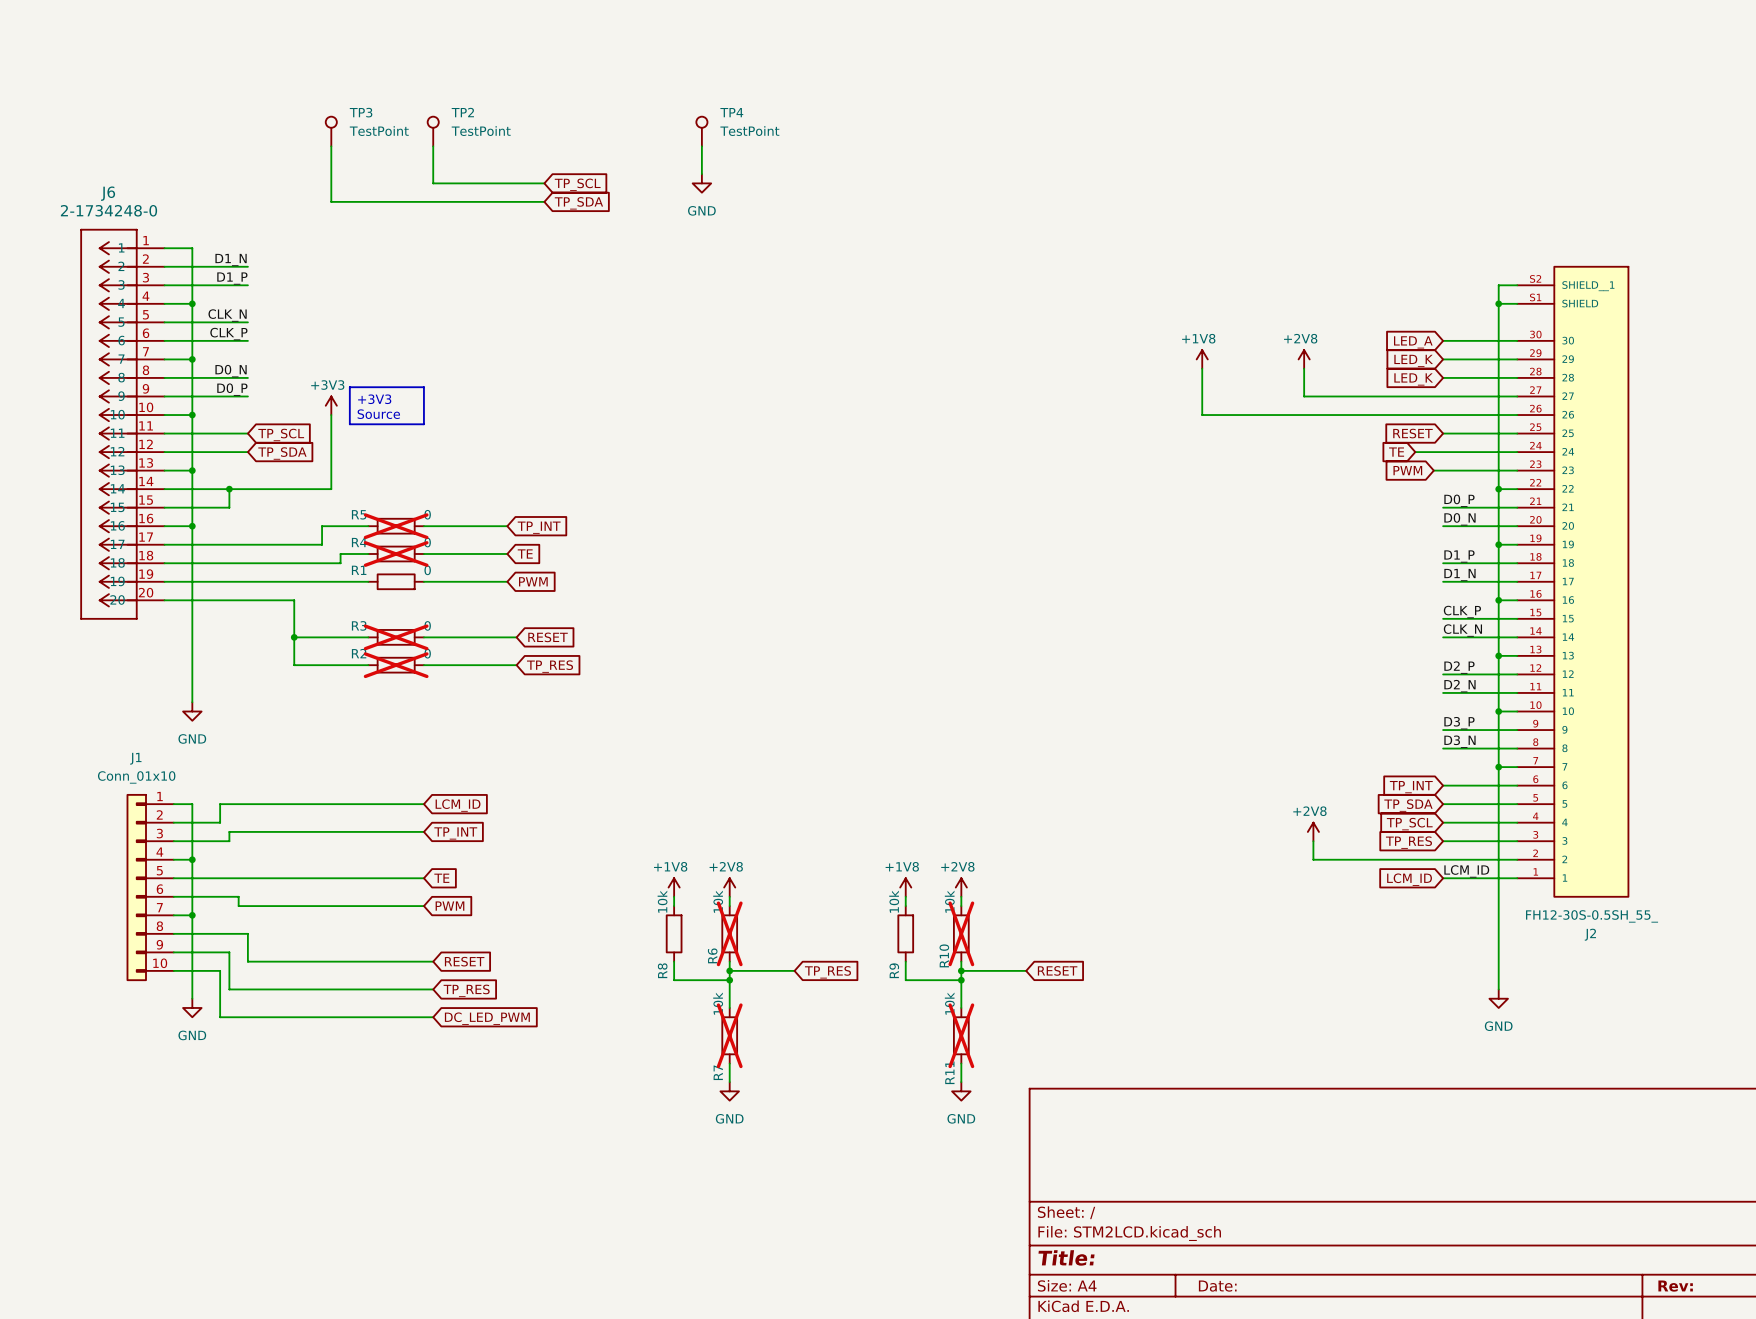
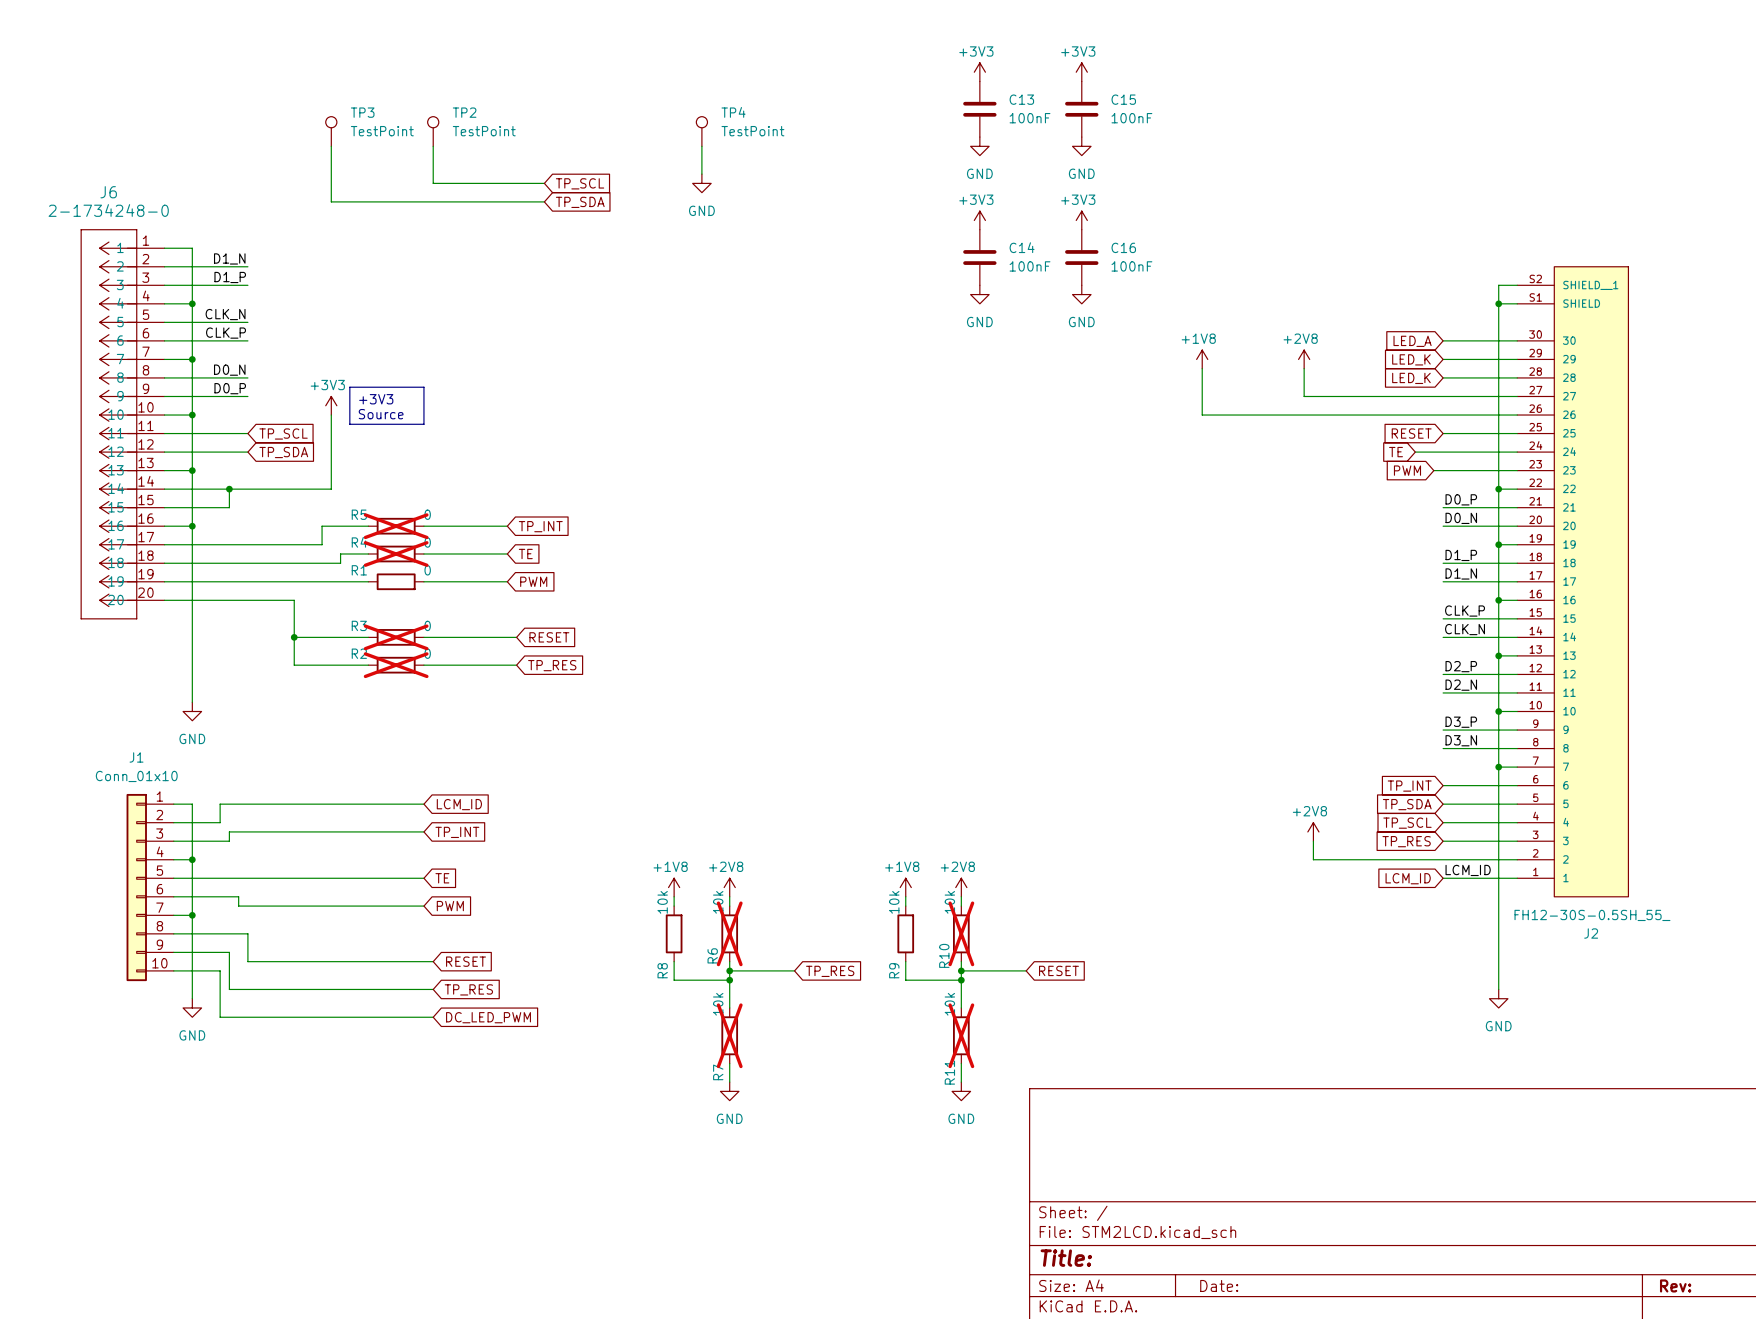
power symbol: none -> +3V3 (979, 72)
power symbol: none -> +3V3 (1081, 72)
C13: none -> 100nF (979, 109)
C15: none -> 100nF (1081, 109)
power symbol: none -> GND (979, 146)
power symbol: none -> GND (1081, 146)
power symbol: none -> +3V3 (979, 220)
power symbol: none -> +3V3 (1081, 220)
C14: none -> 100nF (979, 257)
C16: none -> 100nF (1081, 257)
power symbol: none -> GND (979, 294)
power symbol: none -> GND (1081, 294)

